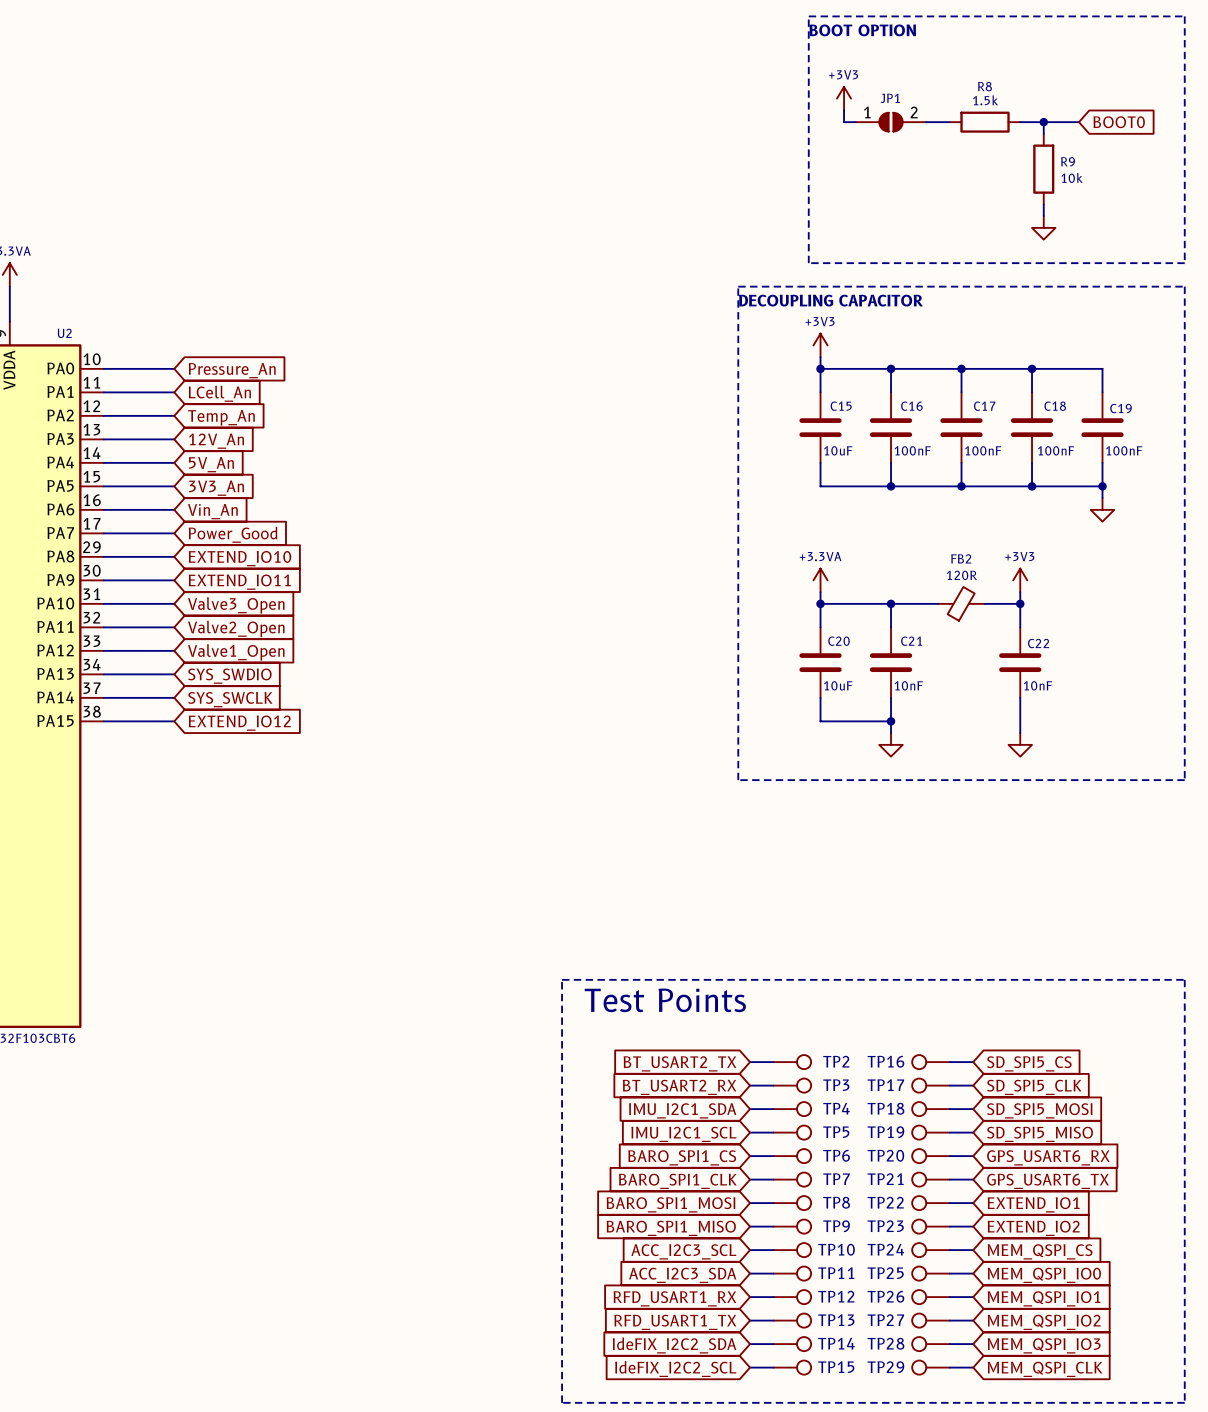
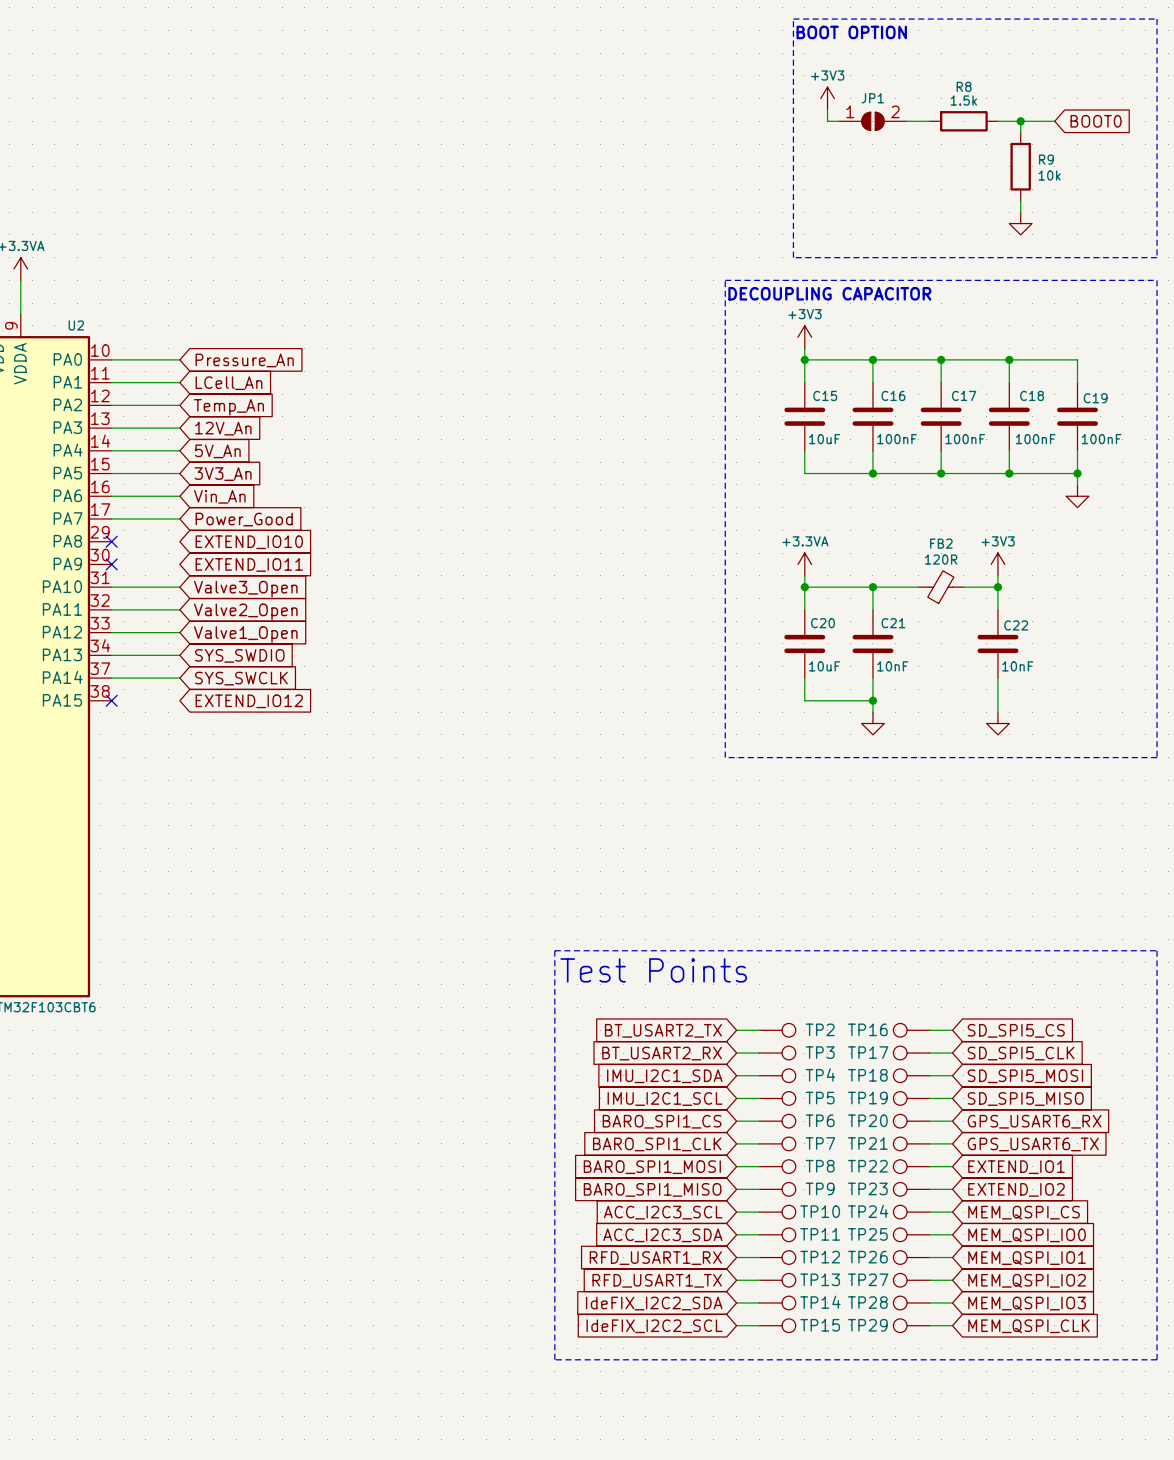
wire: (103, 556) (174, 556) -> none
no-connect mark: none -> (111, 541)
wire: (103, 580) (174, 580) -> none
no-connect mark: none -> (111, 564)
wire: (103, 721) (174, 721) -> none
no-connect mark: none -> (111, 700)

